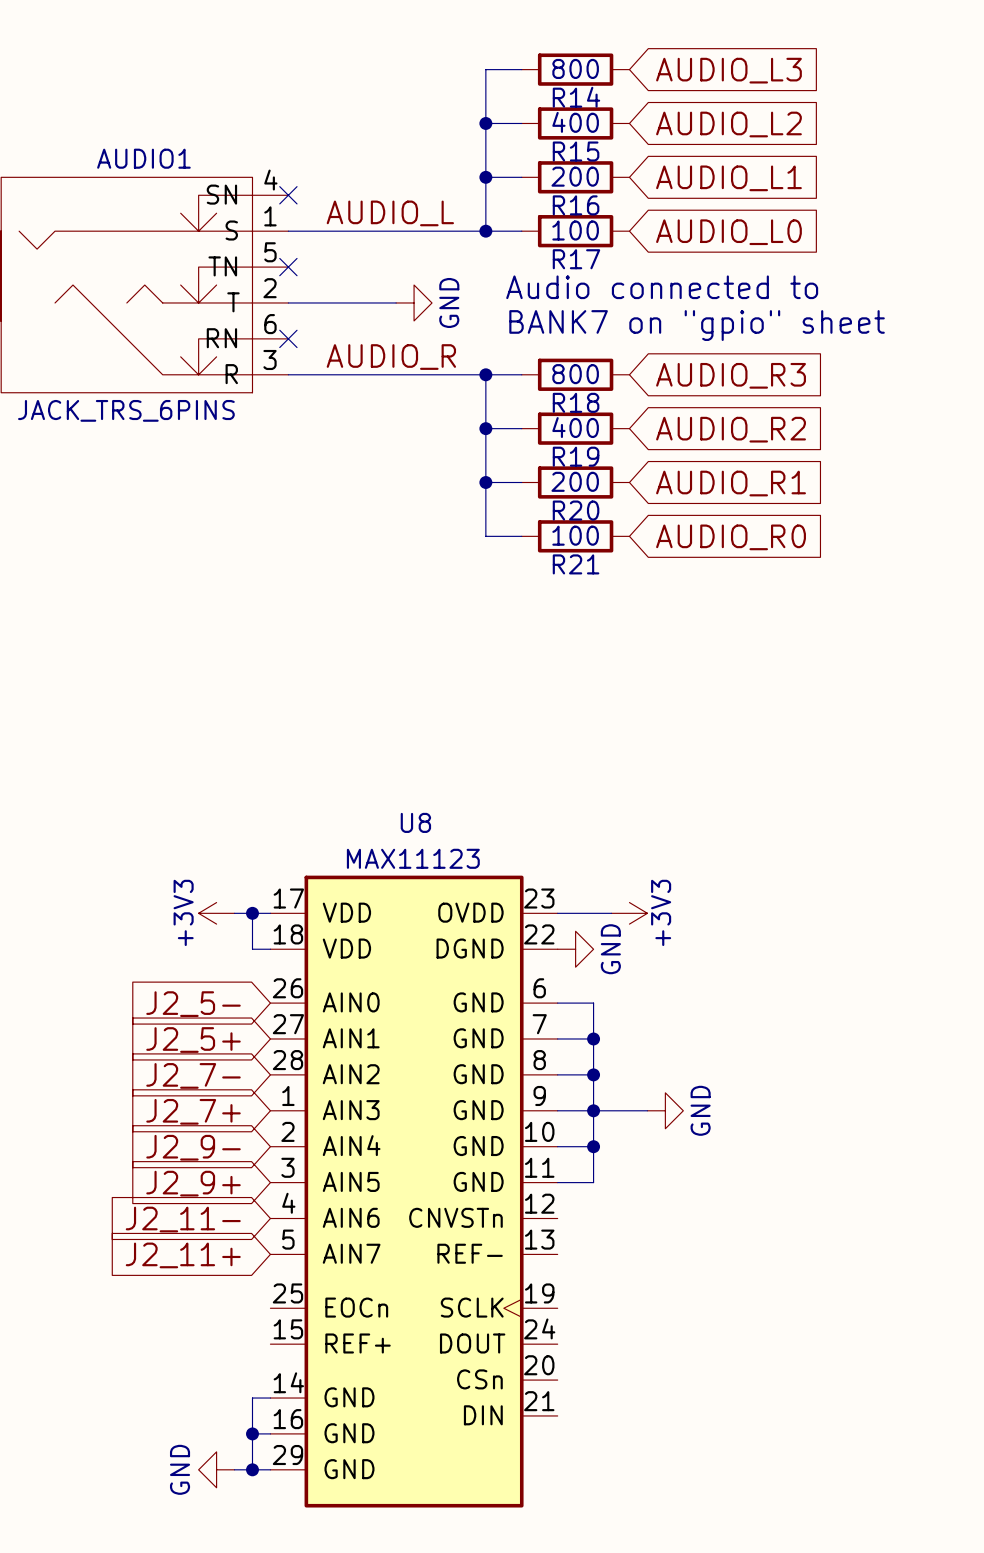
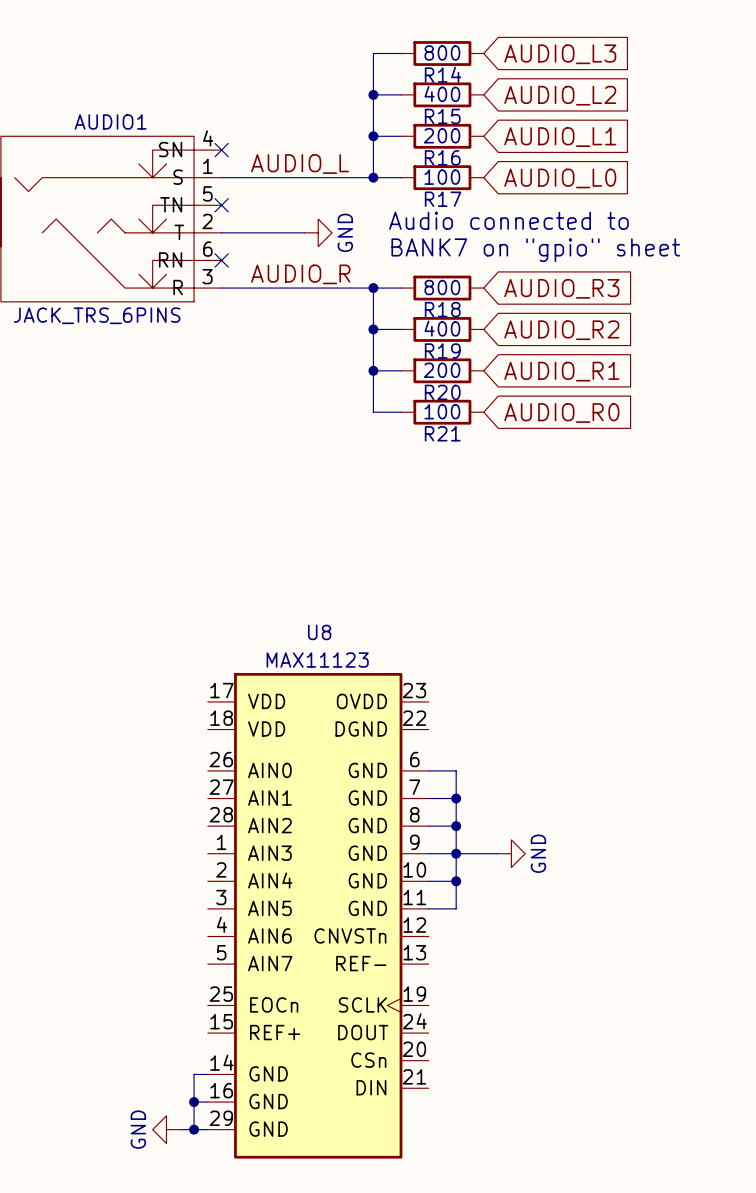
power symbol: +3V3 (216, 913) -> none
wire: (234, 913) (270, 913) -> none
wire: (252, 913) (252, 949) (270, 949) -> none
junction: (252, 913) -> none
wire: (557, 913) (611, 913) -> none
power symbol: +3V3 (629, 913) -> none
power symbol: GND (575, 949) -> none
global label: J2_5- (193, 1004) -> none
global label: J2_5+ (193, 1040) -> none
global label: J2_7- (193, 1075) -> none
global label: J2_7+ (193, 1111) -> none
global label: J2_9- (193, 1147) -> none
global label: J2_9+ (193, 1183) -> none
global label: J2_11- (183, 1219) -> none
global label: J2_11+ (183, 1255) -> none

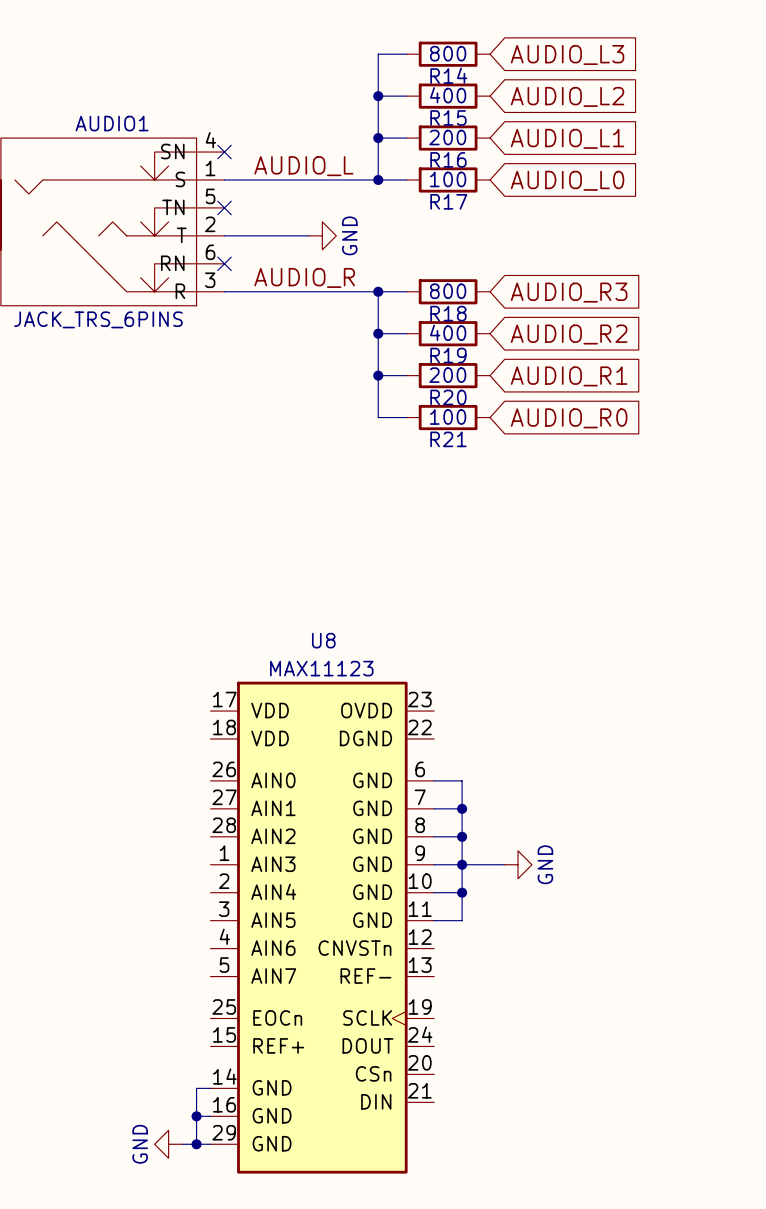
text: Audio connected to (508, 220) -> none
text: BANK7 on "gpio" sheet (535, 250) -> none

